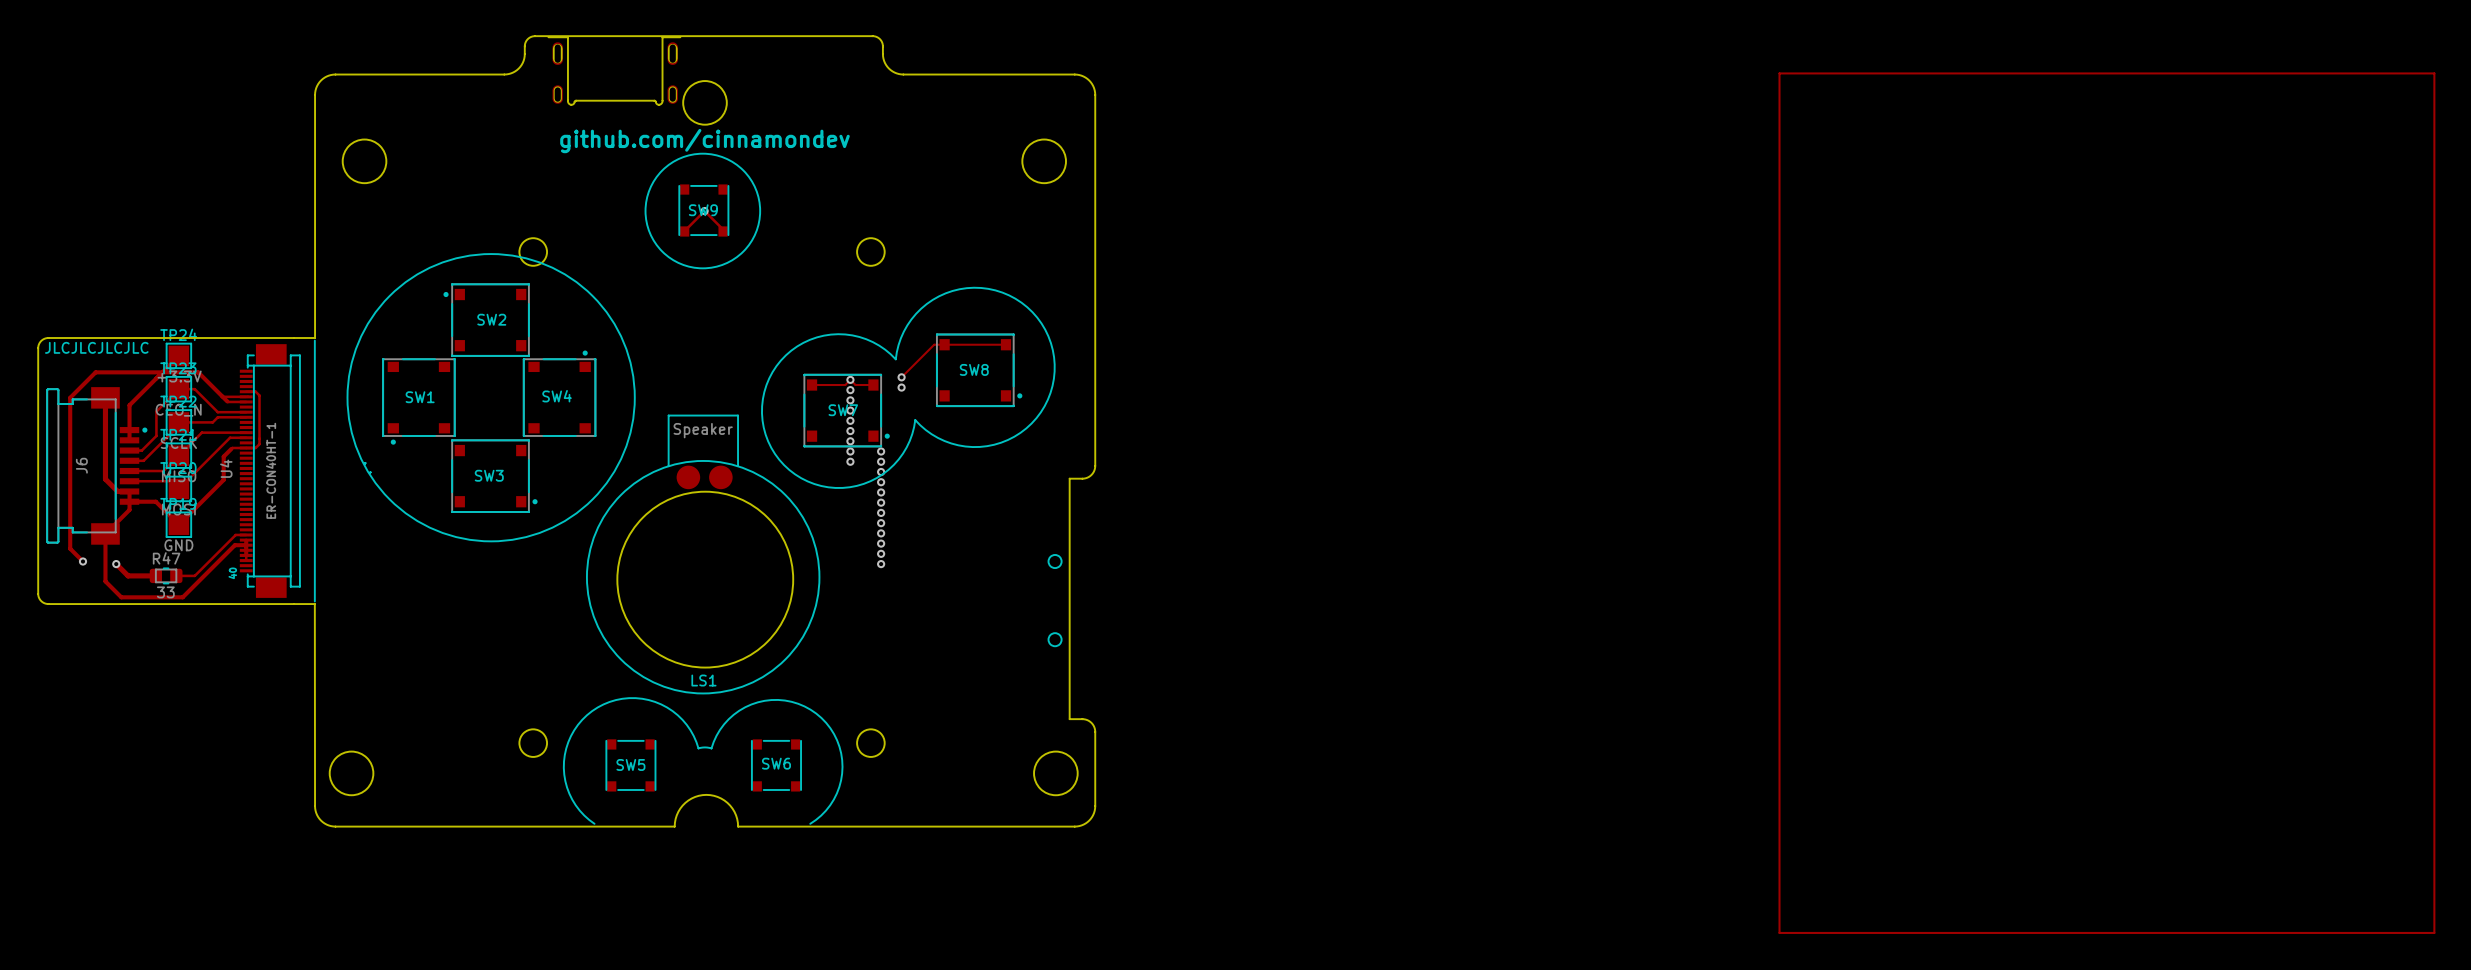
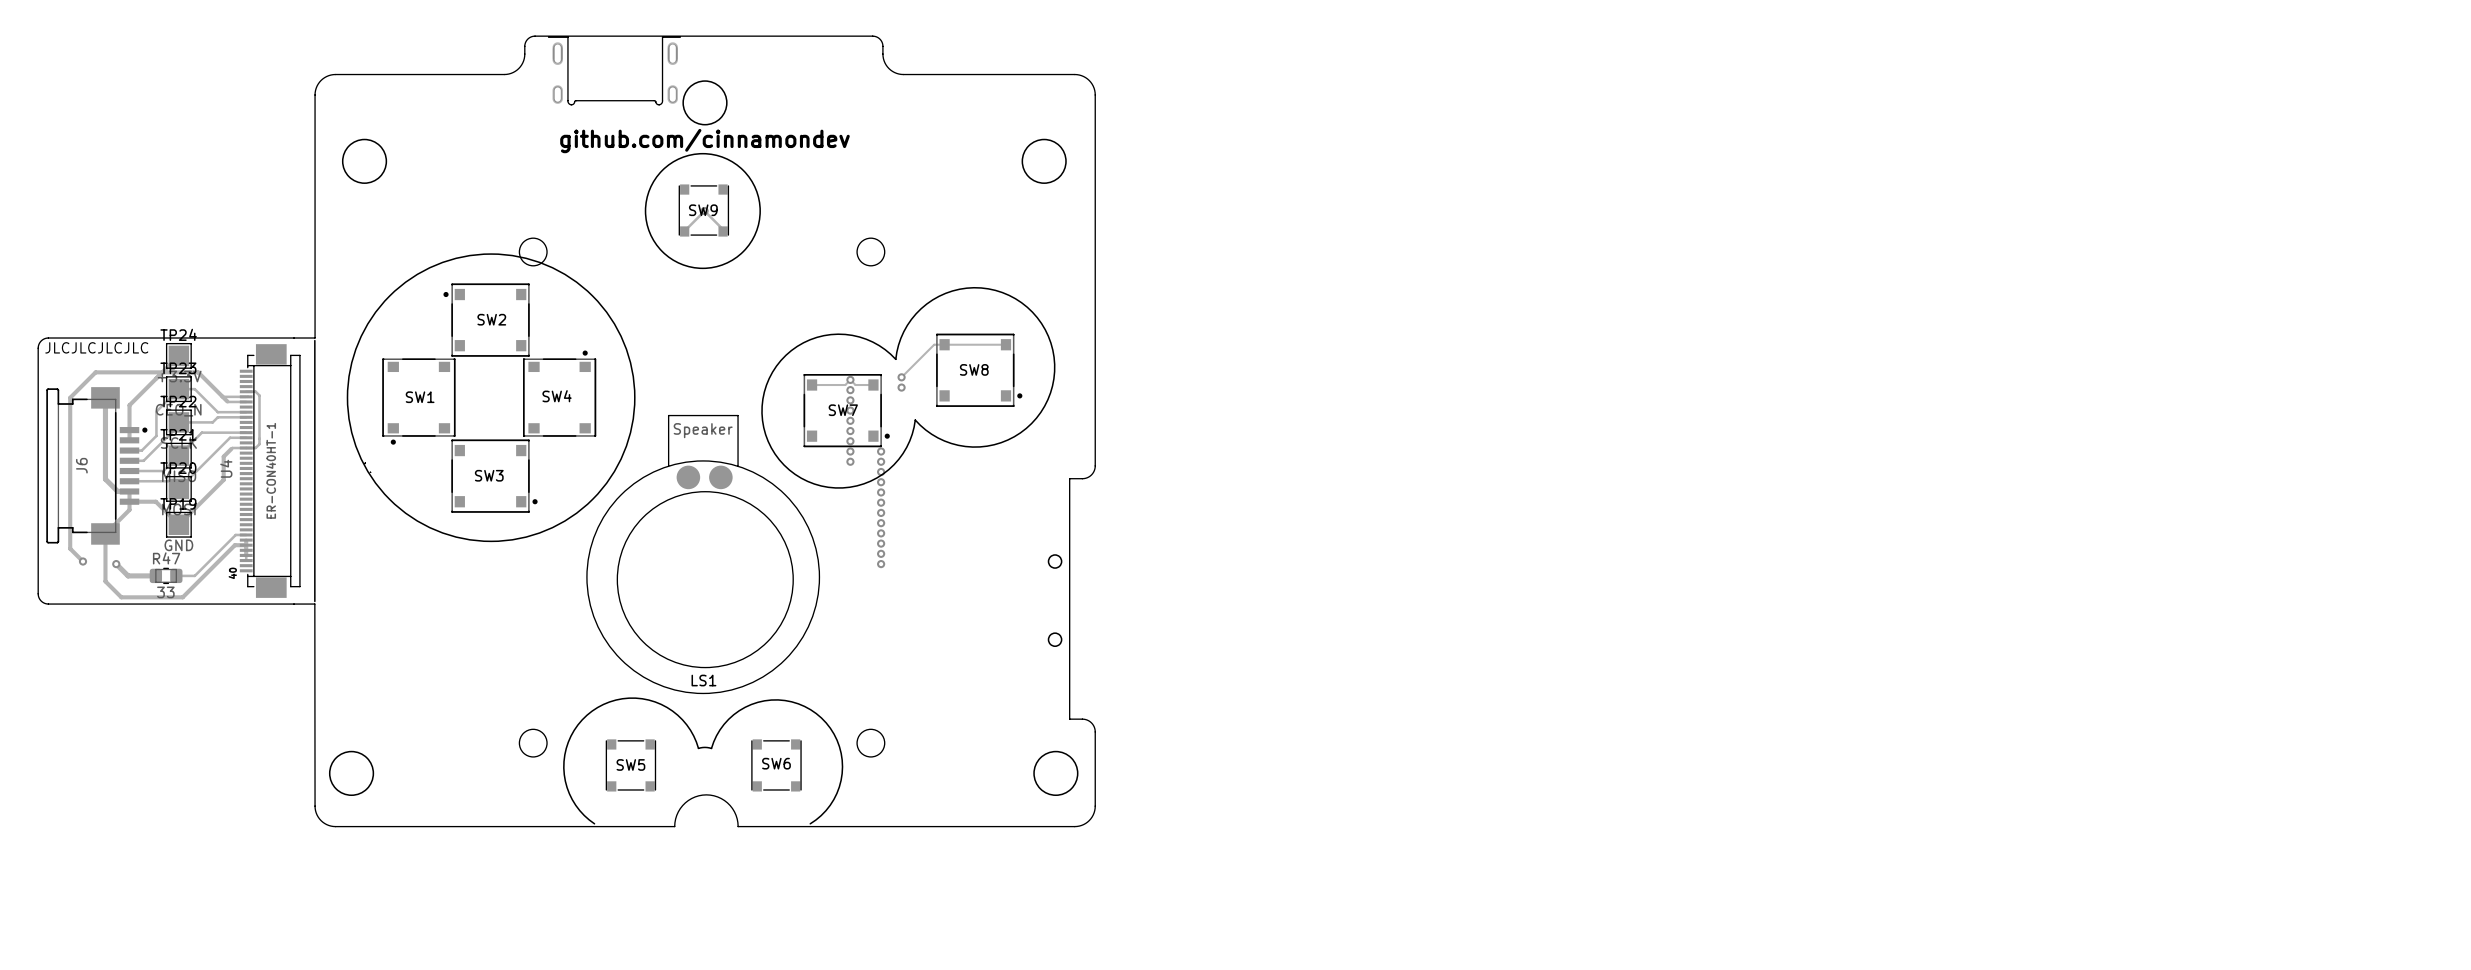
track: (1779, 73) (2434, 73) (2434, 932) (1779, 932) (1779, 73) -> none

